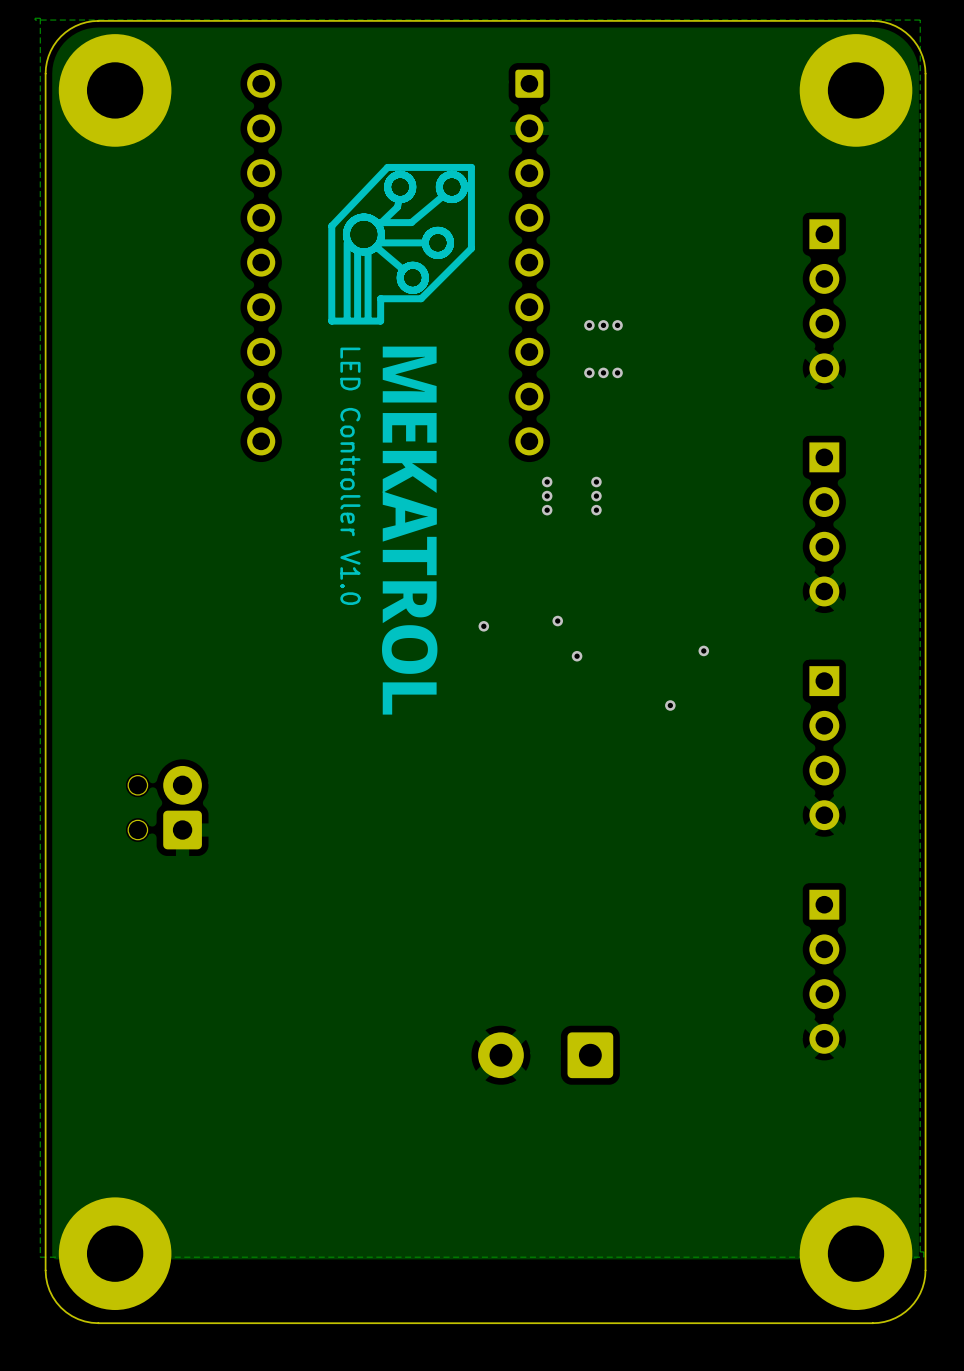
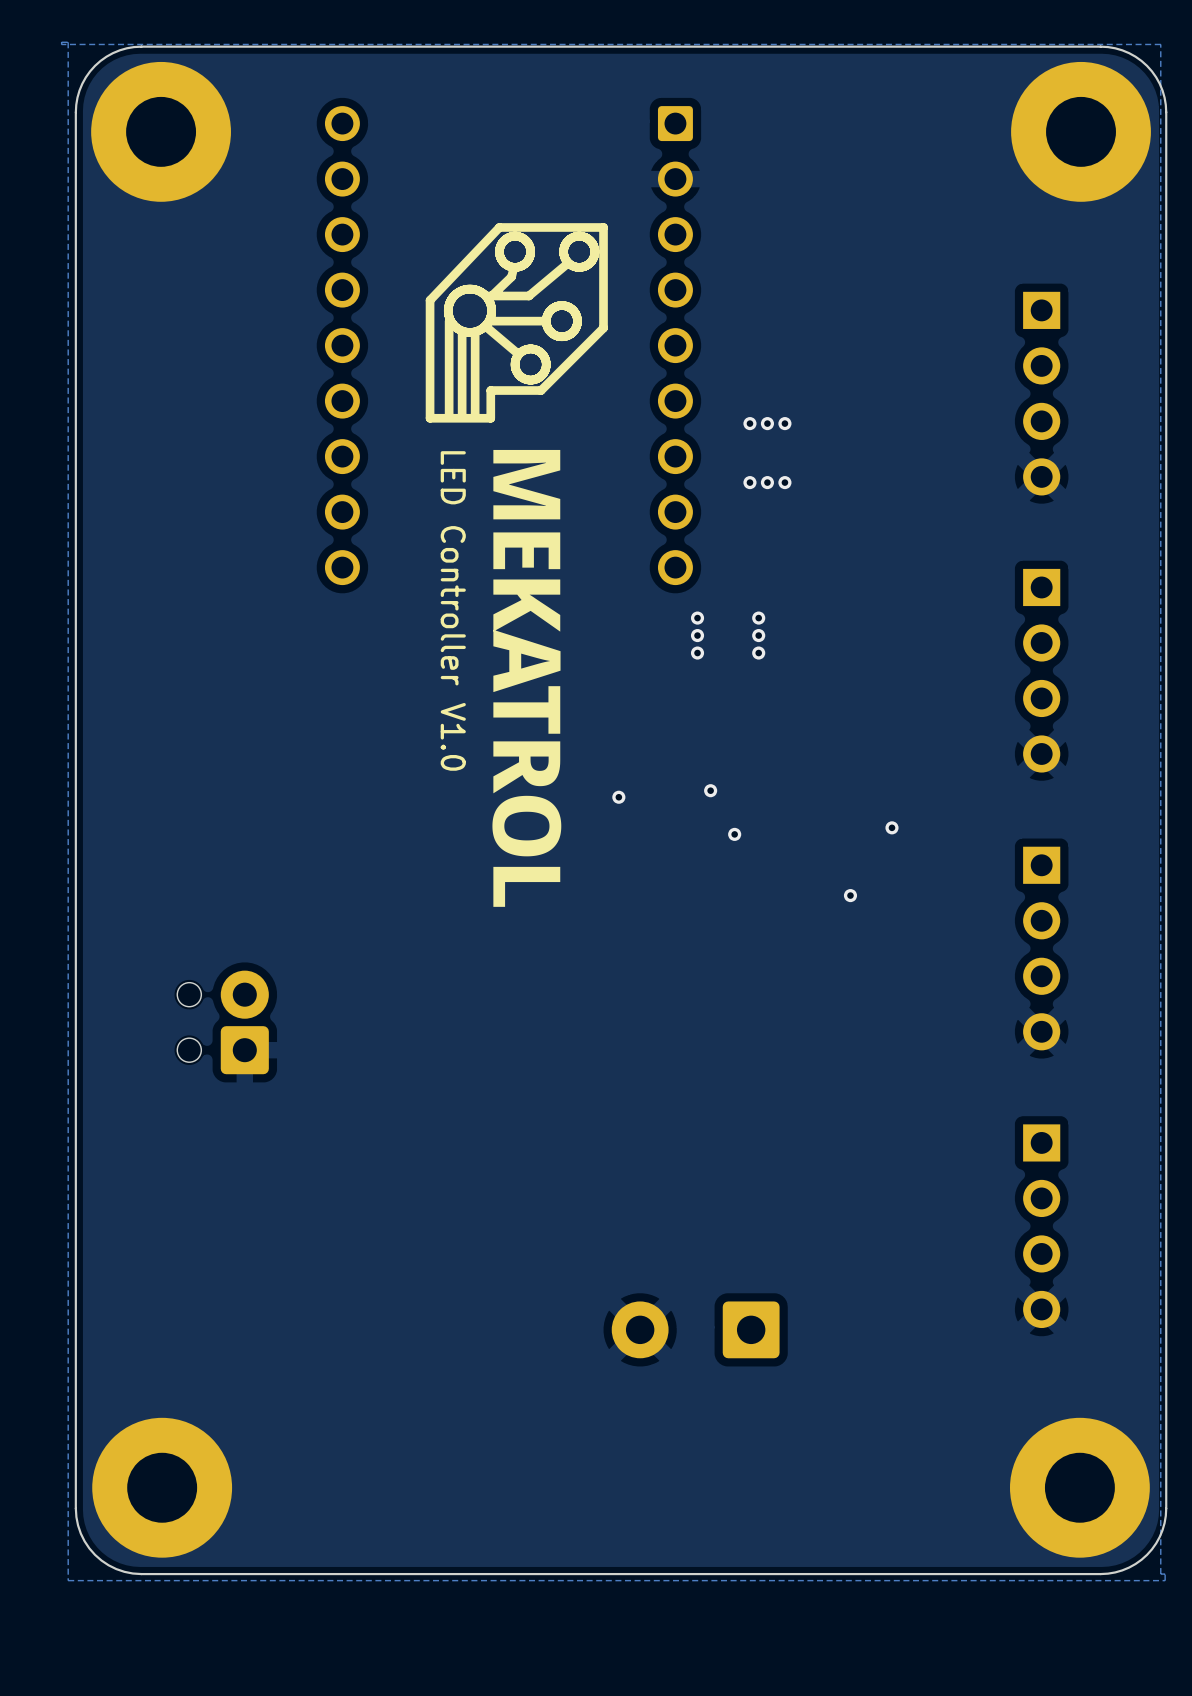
board edge: (872, 20) (98, 20) (86, 22) (70, 29) (53, 45) (48, 56) (45, 73) (45, 1270) (47, 1284) (52, 1296) (61, 1307) (72, 1316) (84, 1321) (98, 1323) (872, 1323) (895, 1317) (905, 1311) (917, 1298) (924, 1282) (925, 1270) (925, 73) (922, 56) (910, 36) (895, 26) (872, 20) -> (1100, 46) (1115, 48) (1129, 53) (1147, 65) (1156, 77) (1162, 90) (1166, 112) (1166, 1508) (1162, 1530) (1156, 1543) (1147, 1554) (1135, 1564) (1115, 1572) (1100, 1574) (141, 1574) (124, 1571) (108, 1565) (95, 1554) (84, 1541) (78, 1525) (75, 1508) (75, 112) (77, 97) (85, 77) (100, 60) (112, 53) (126, 48) (141, 46) (1100, 46)
part position: (115, 1253) -> (162, 1487)
part position: (856, 1253) -> (1079, 1487)

